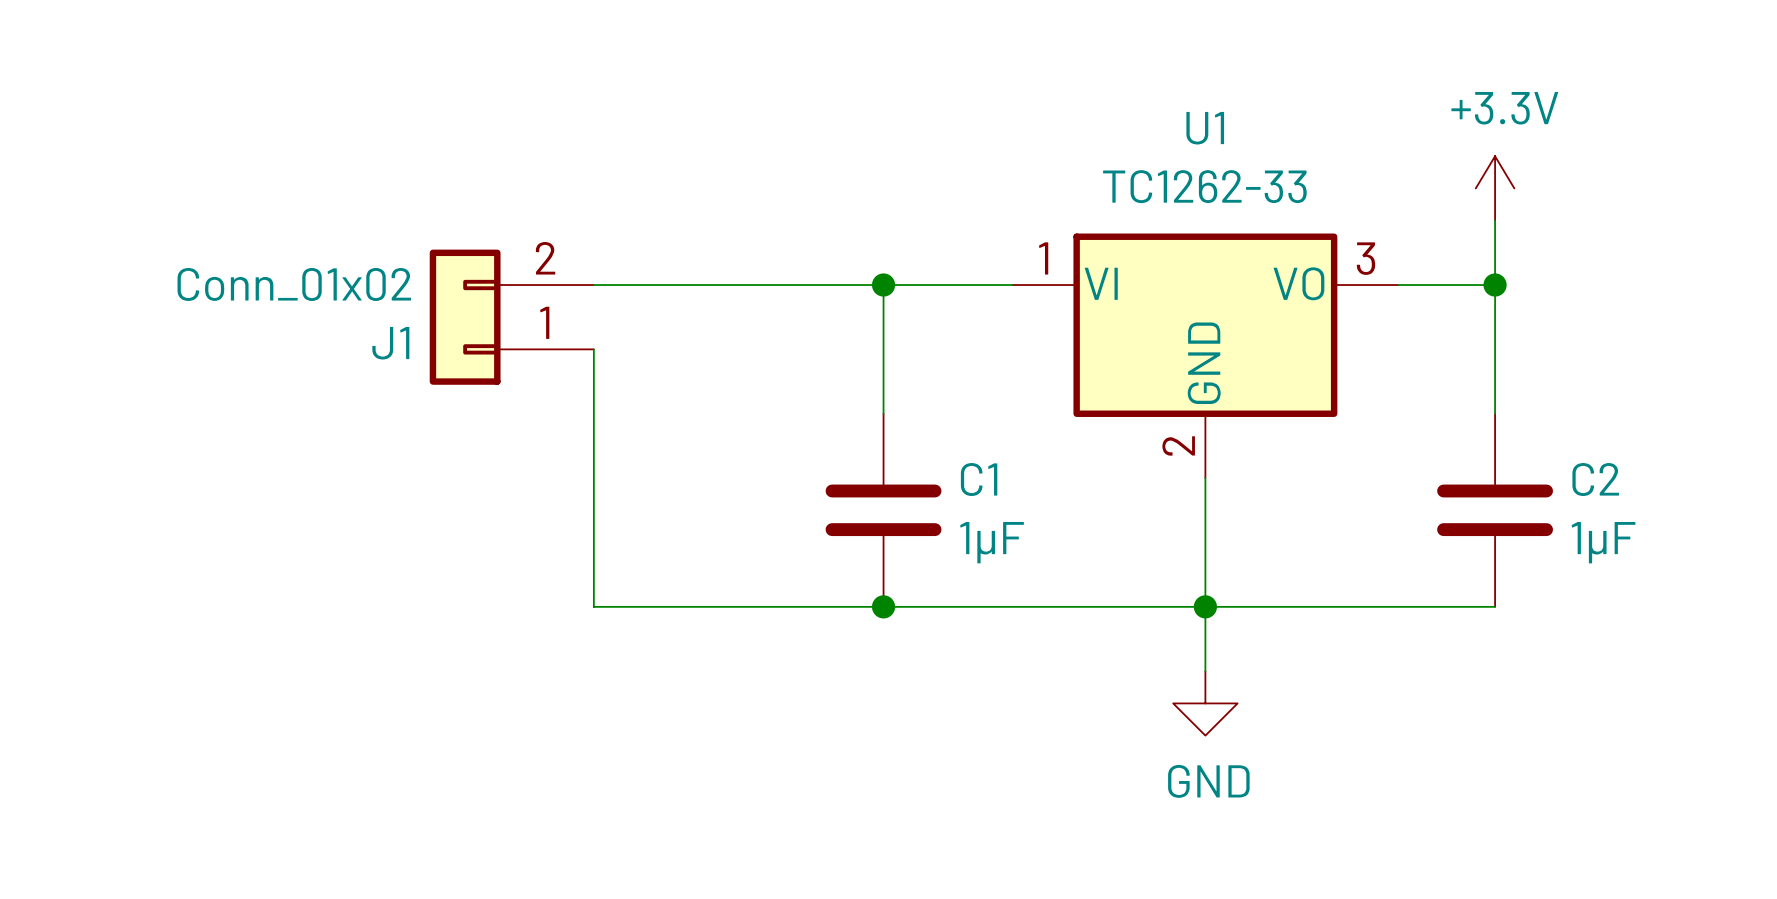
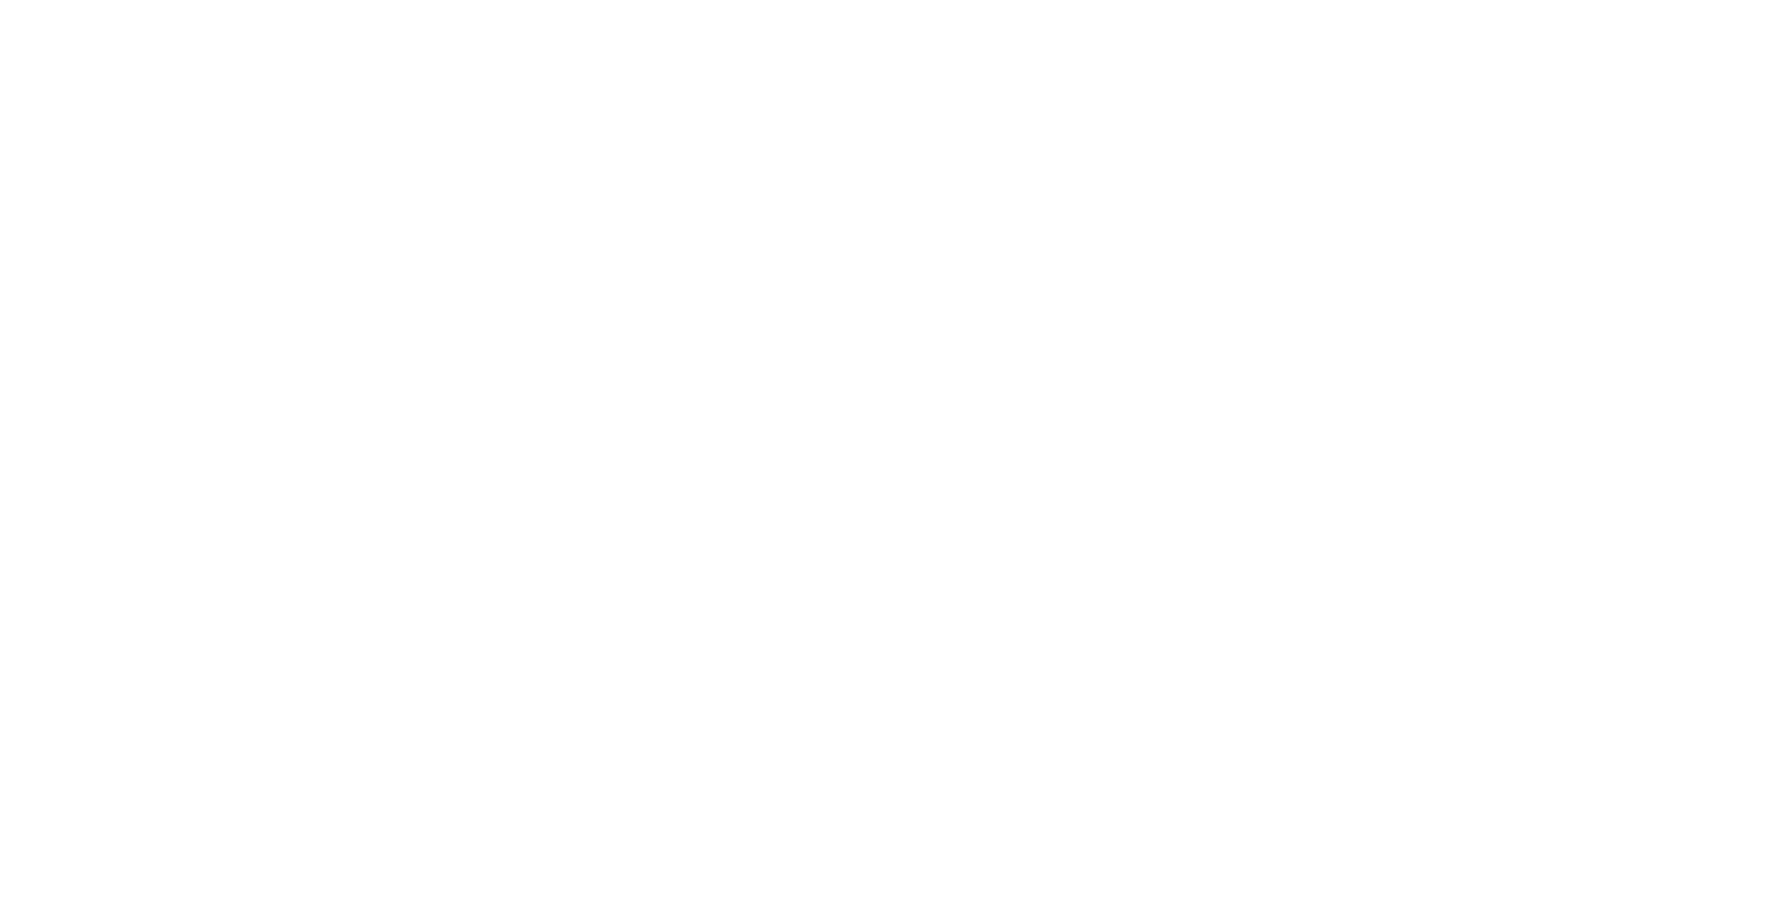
power symbol: +3.3V (1495, 188) -> none
wire: (1495, 220) (1495, 413) -> none
wire: (593, 285) (1012, 285) -> none
wire: (883, 285) (883, 413) -> none
junction: (883, 285) -> none
wire: (1398, 285) (1495, 285) -> none
junction: (1495, 285) -> none
J1: Conn_01x02 (511, 317) -> none
wire: (593, 349) (593, 606) (1495, 606) -> none
U1: TC1262-33 (1205, 355) -> none
wire: (1205, 478) (1205, 671) -> none
C1: 1µF (883, 510) -> none
C2: 1µF (1495, 510) -> none
junction: (883, 606) -> none
junction: (1205, 606) -> none
power symbol: GND (1205, 703) -> none

